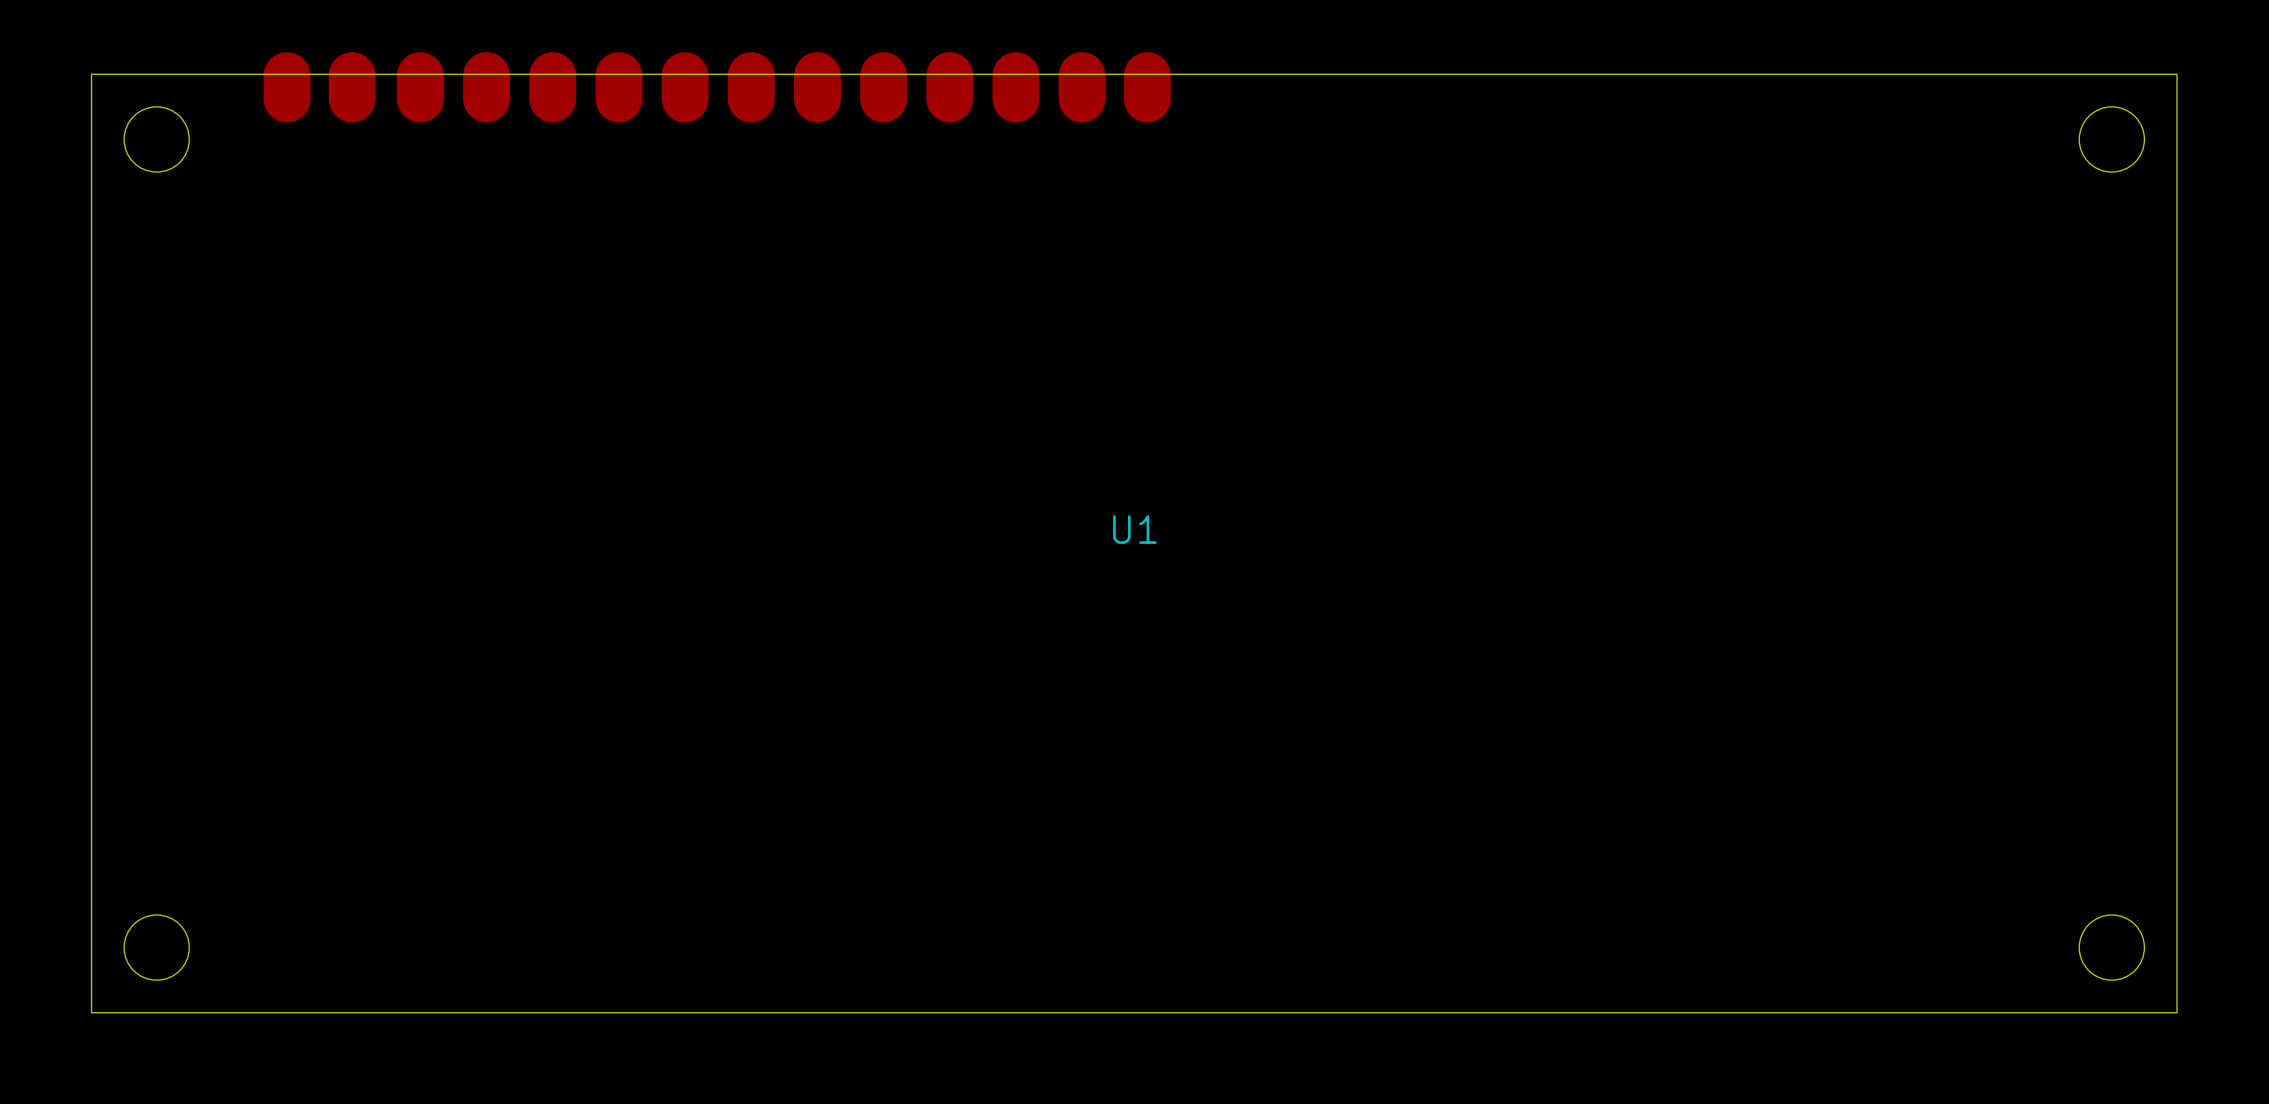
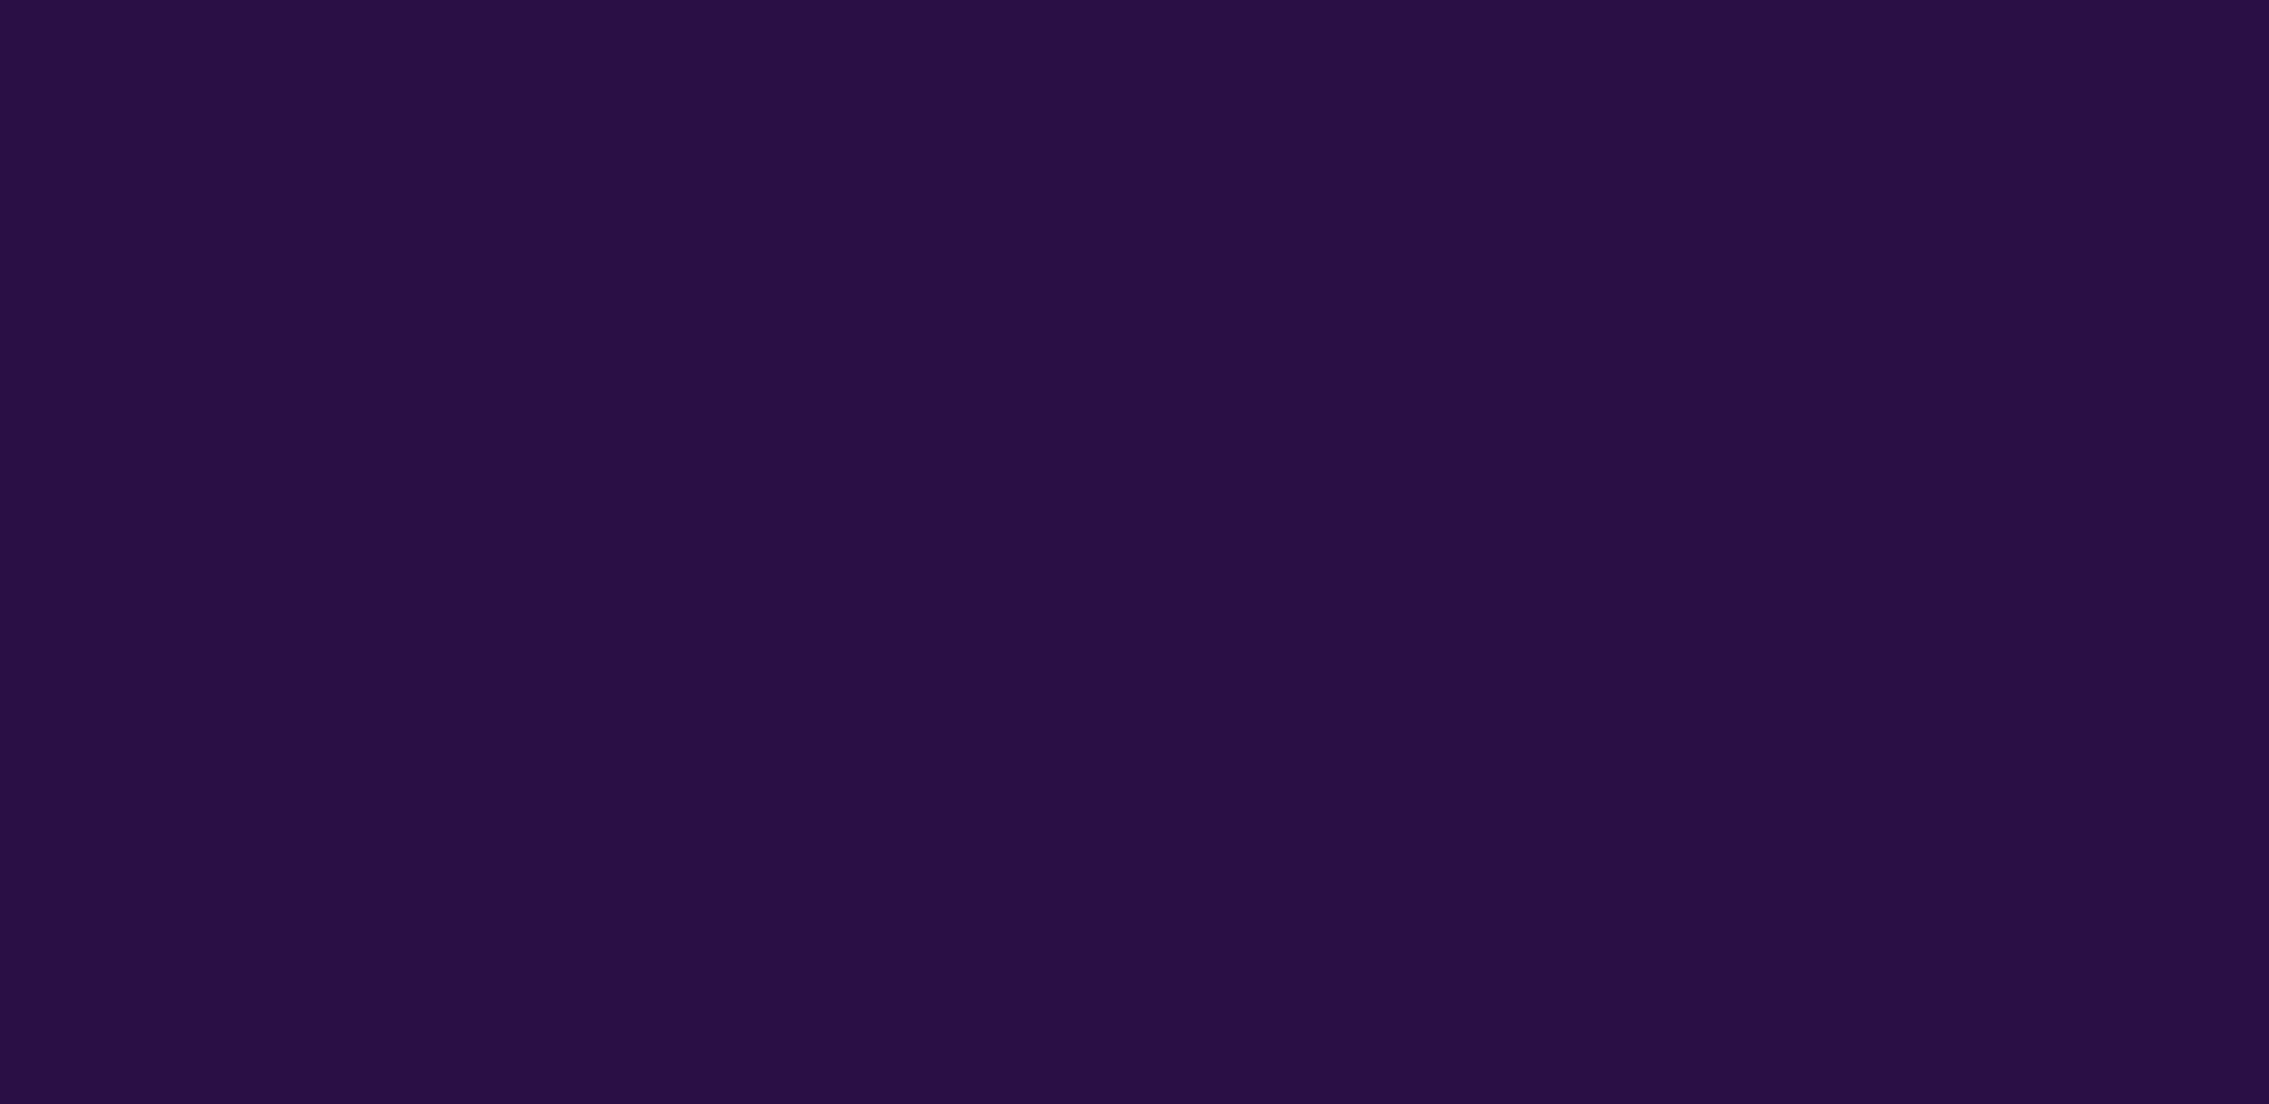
U1: (1134, 532) -> none

